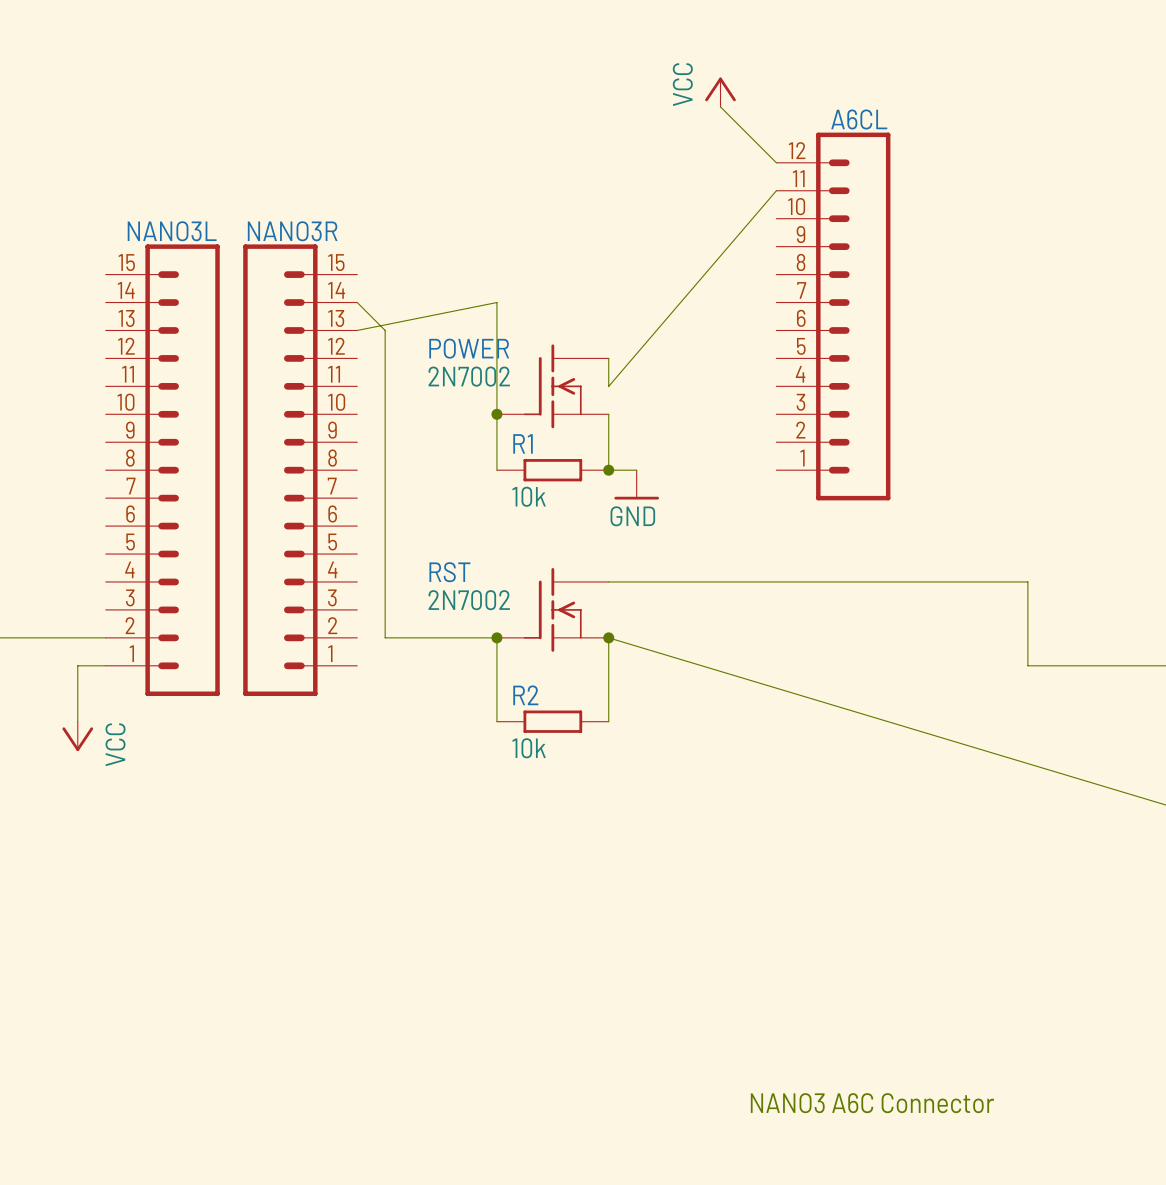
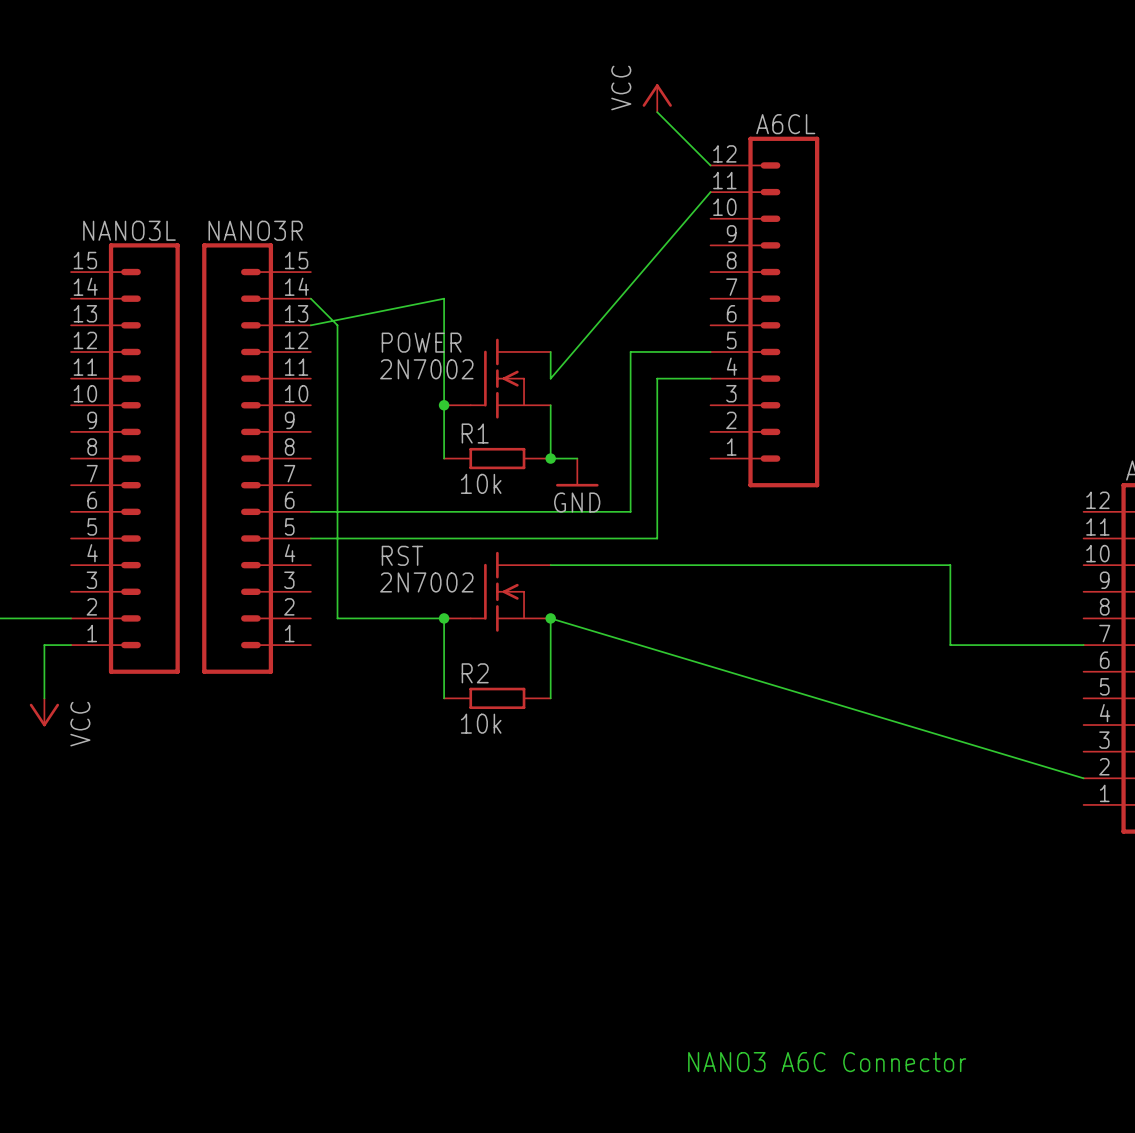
wire: none -> (710, 351) (630, 351) (630, 511) (310, 511)
wire: none -> (710, 378) (657, 378) (657, 538) (310, 538)

